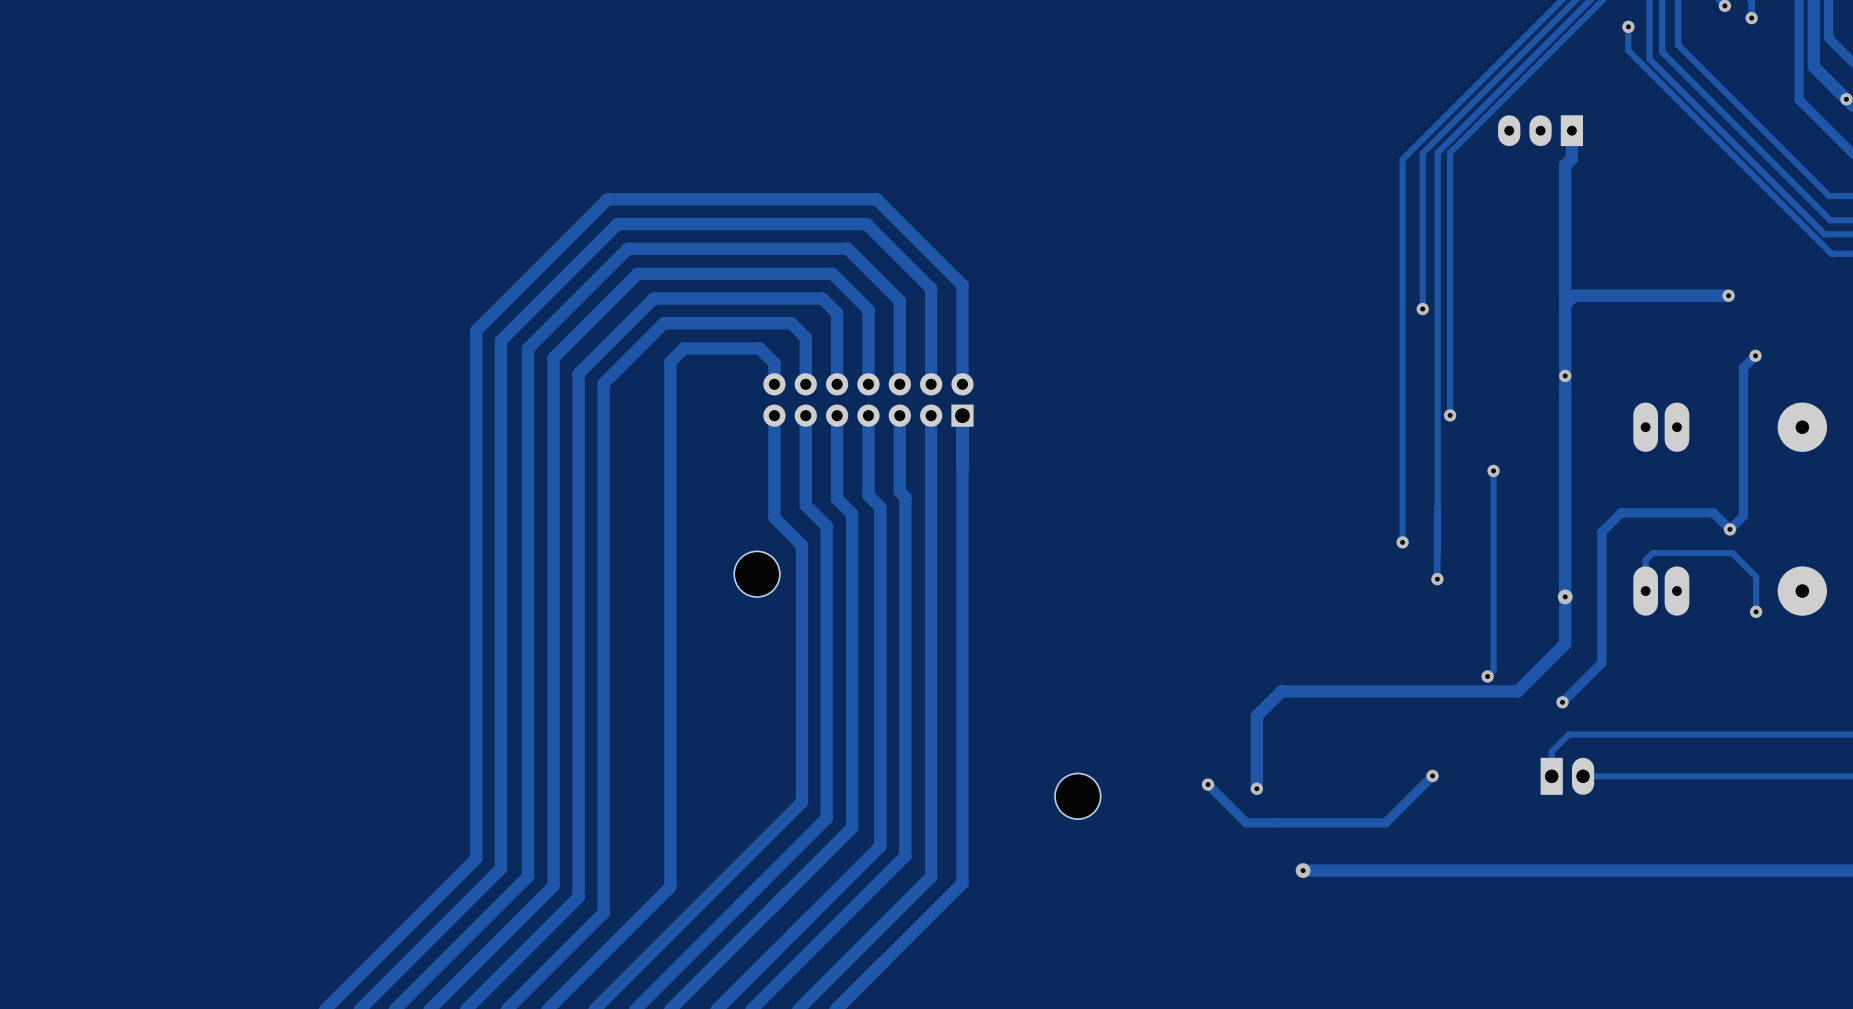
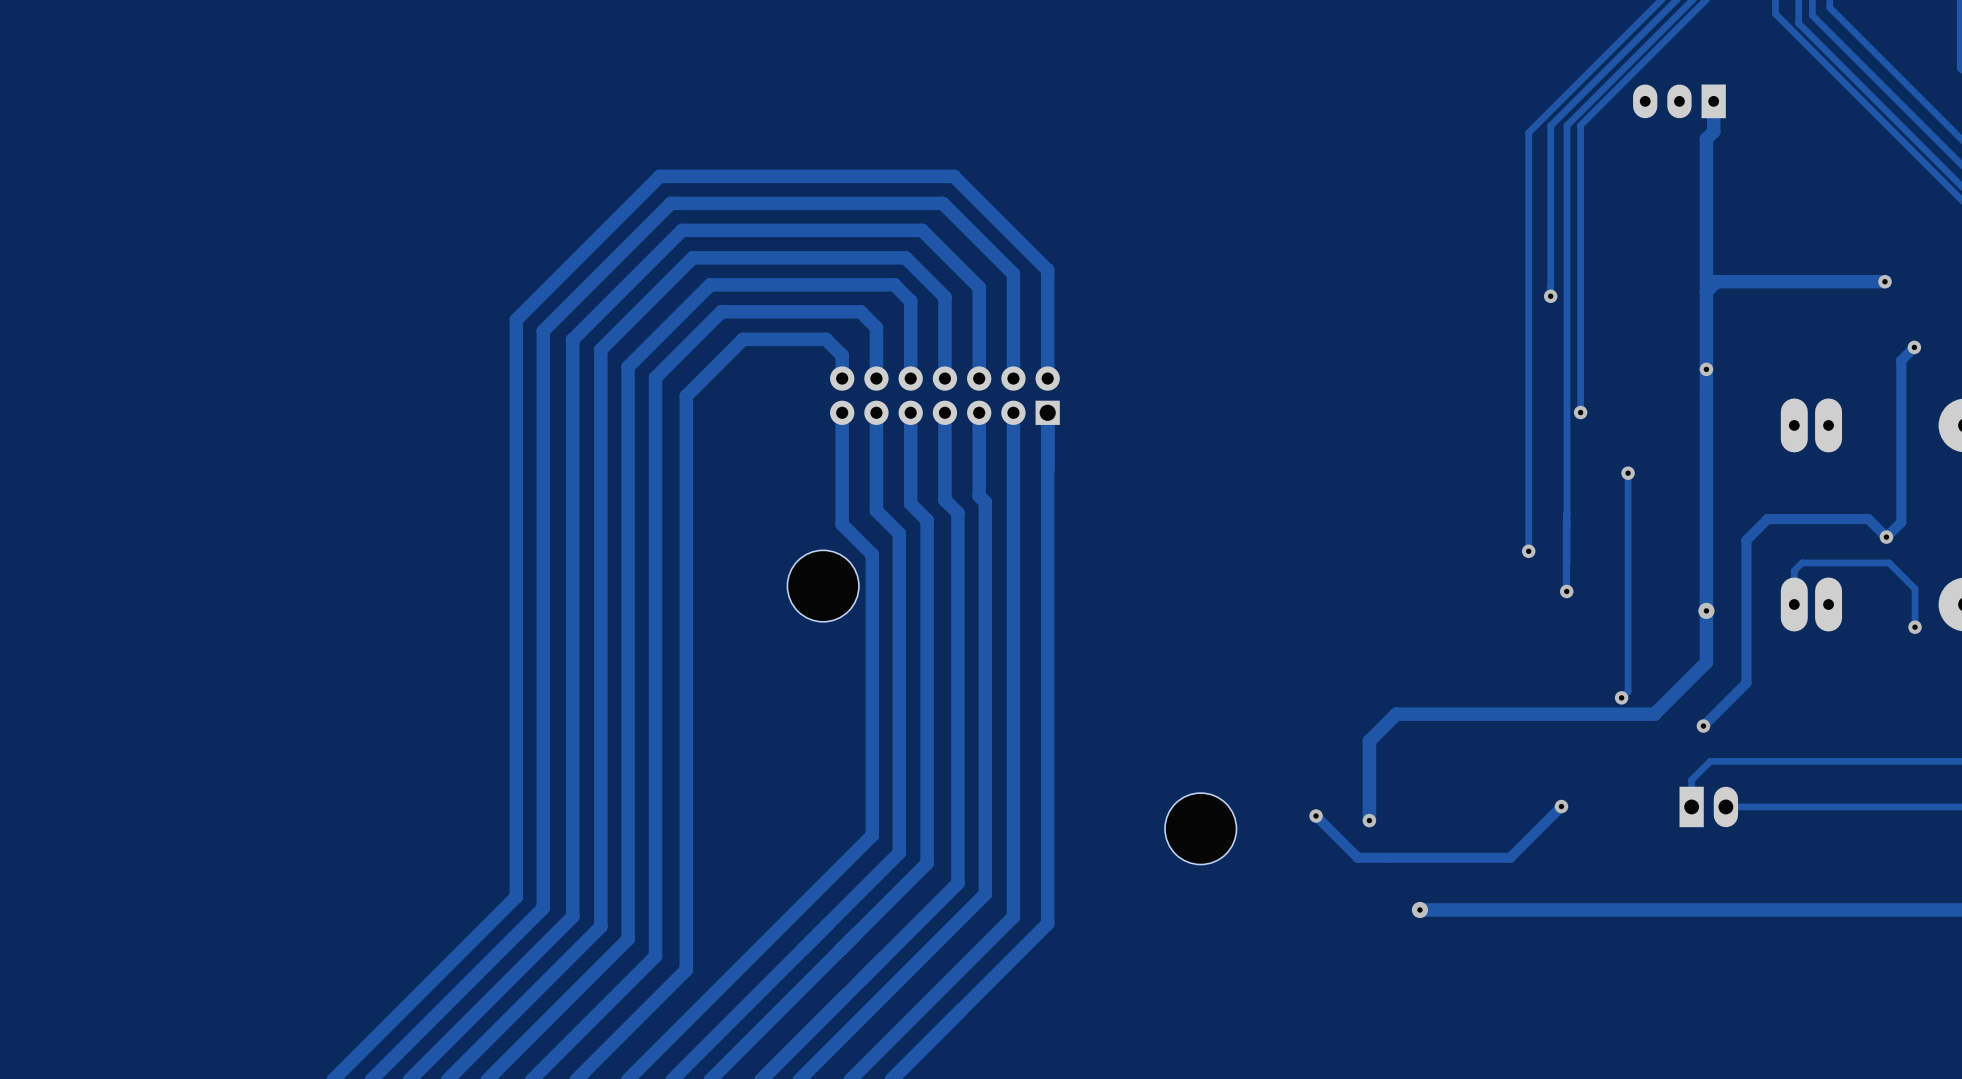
track: (670, 361) (670, 886) (631, 925) -> (728, 354) (686, 396) (686, 969)
part footprint: [734, 551, 780, 598] -> [787, 550, 859, 622]
part: (1077, 796) -> none
part: none -> (1200, 828)

